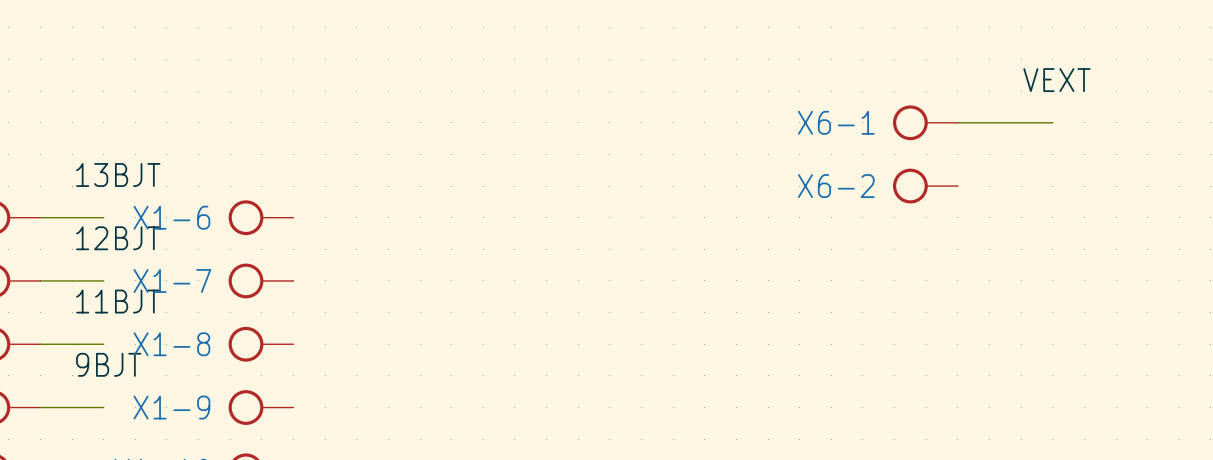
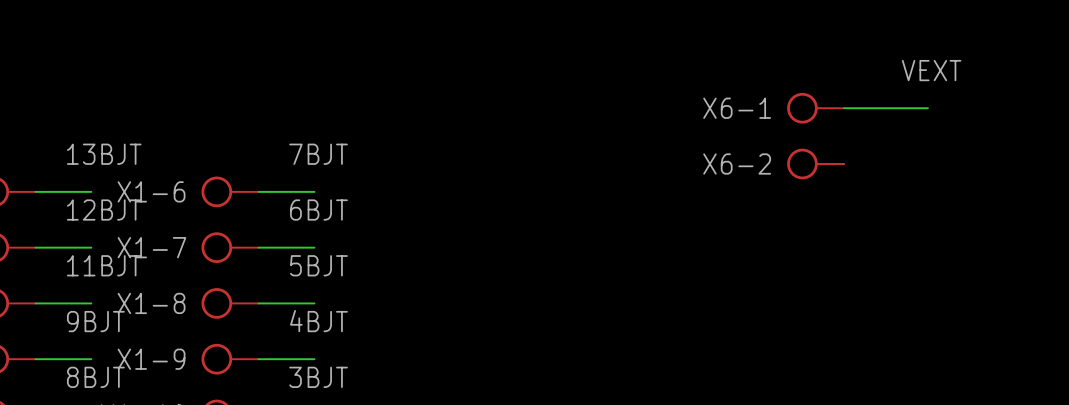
label: none -> 7BJT (318, 154)
wire: none -> (258, 191) (314, 191)
label: none -> 6BJT (318, 210)
wire: none -> (258, 247) (314, 247)
label: none -> 5BJT (318, 265)
wire: none -> (258, 303) (314, 303)
label: none -> 4BJT (318, 321)
wire: none -> (258, 359) (314, 359)
label: none -> 8BJT (95, 377)
label: none -> 3BJT (318, 377)

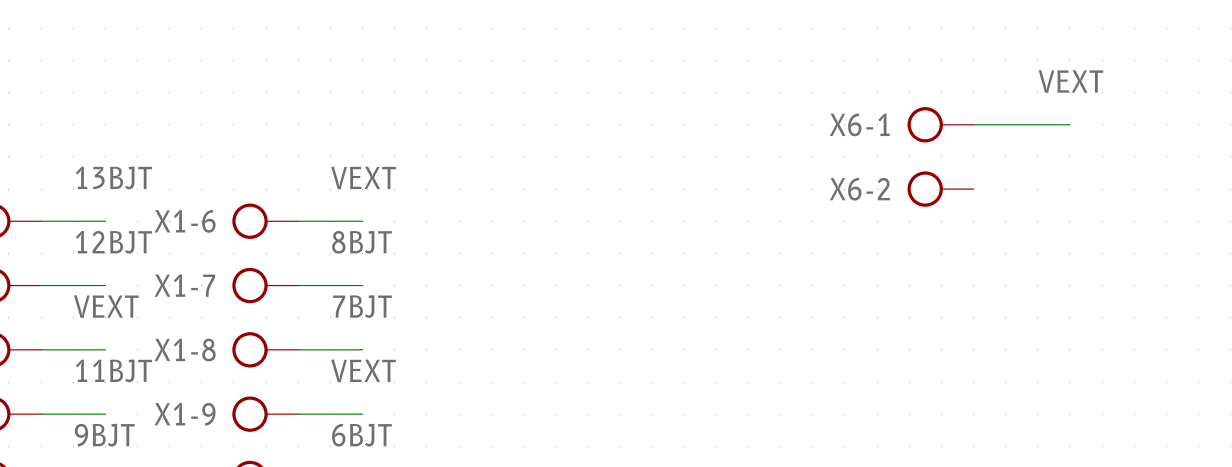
label: 7BJT (318, 154) -> VEXT (363, 177)
label: 6BJT (318, 210) -> 8BJT (362, 242)
label: 11BJT (104, 265) -> VEXT (106, 306)
label: 5BJT (318, 265) -> 7BJT (362, 306)
label: 9BJT (95, 321) -> 11BJT (113, 370)
label: 4BJT (318, 321) -> VEXT (363, 370)
label: 8BJT (95, 377) -> 9BJT (104, 435)
label: 3BJT (318, 377) -> 6BJT (361, 435)

